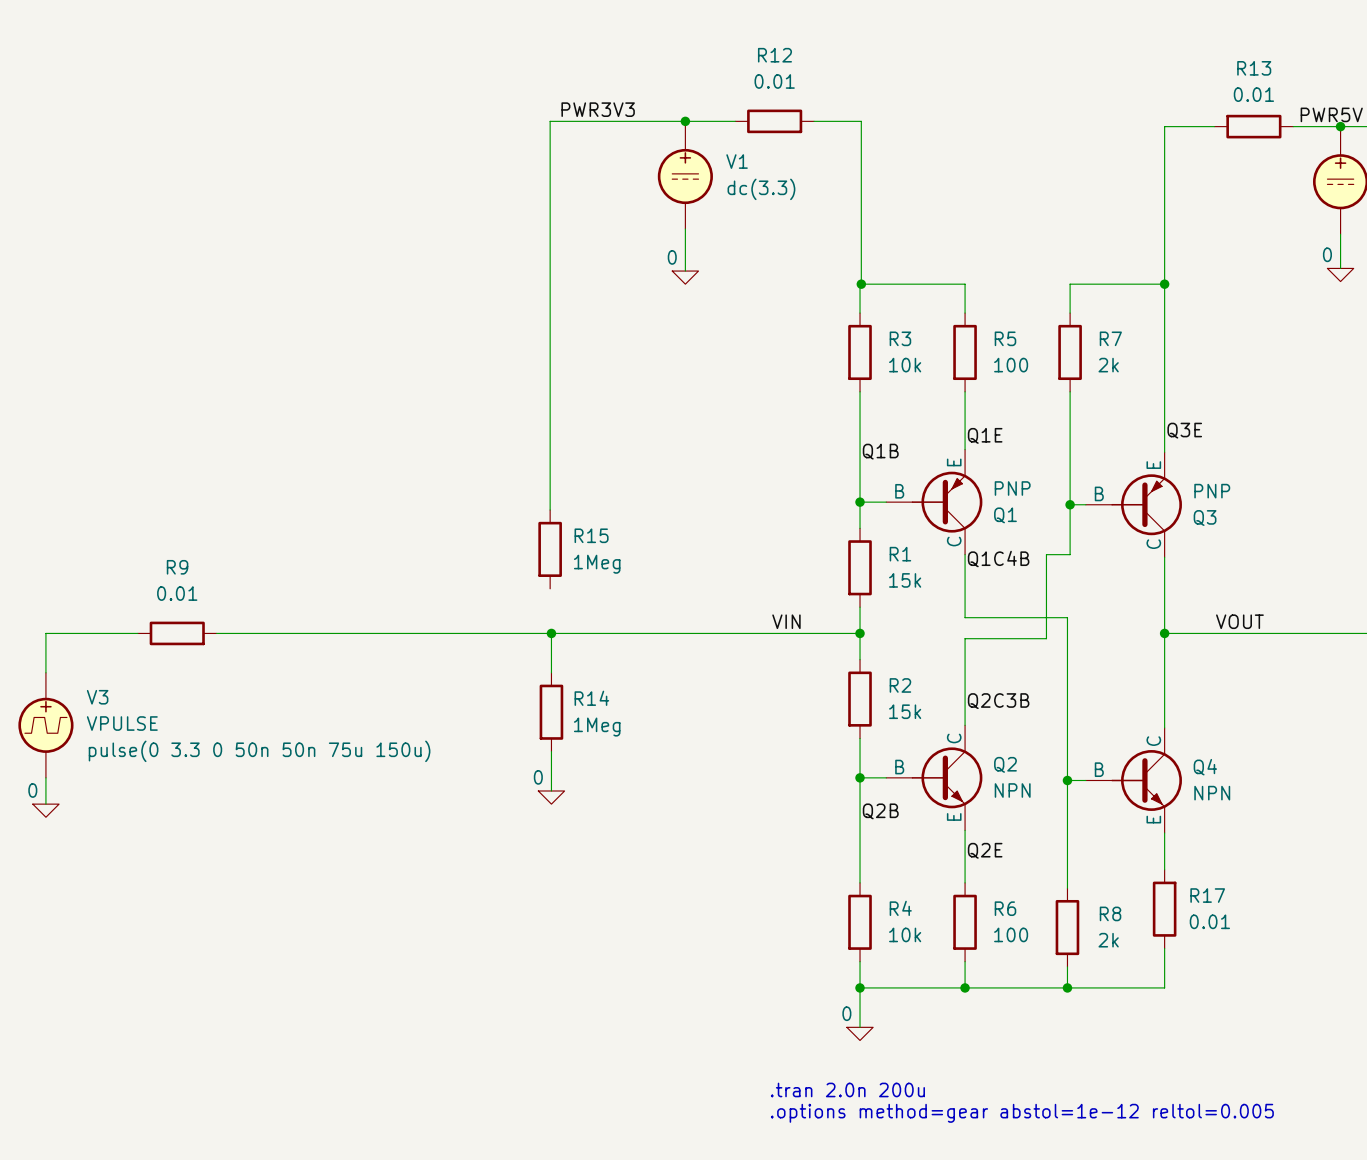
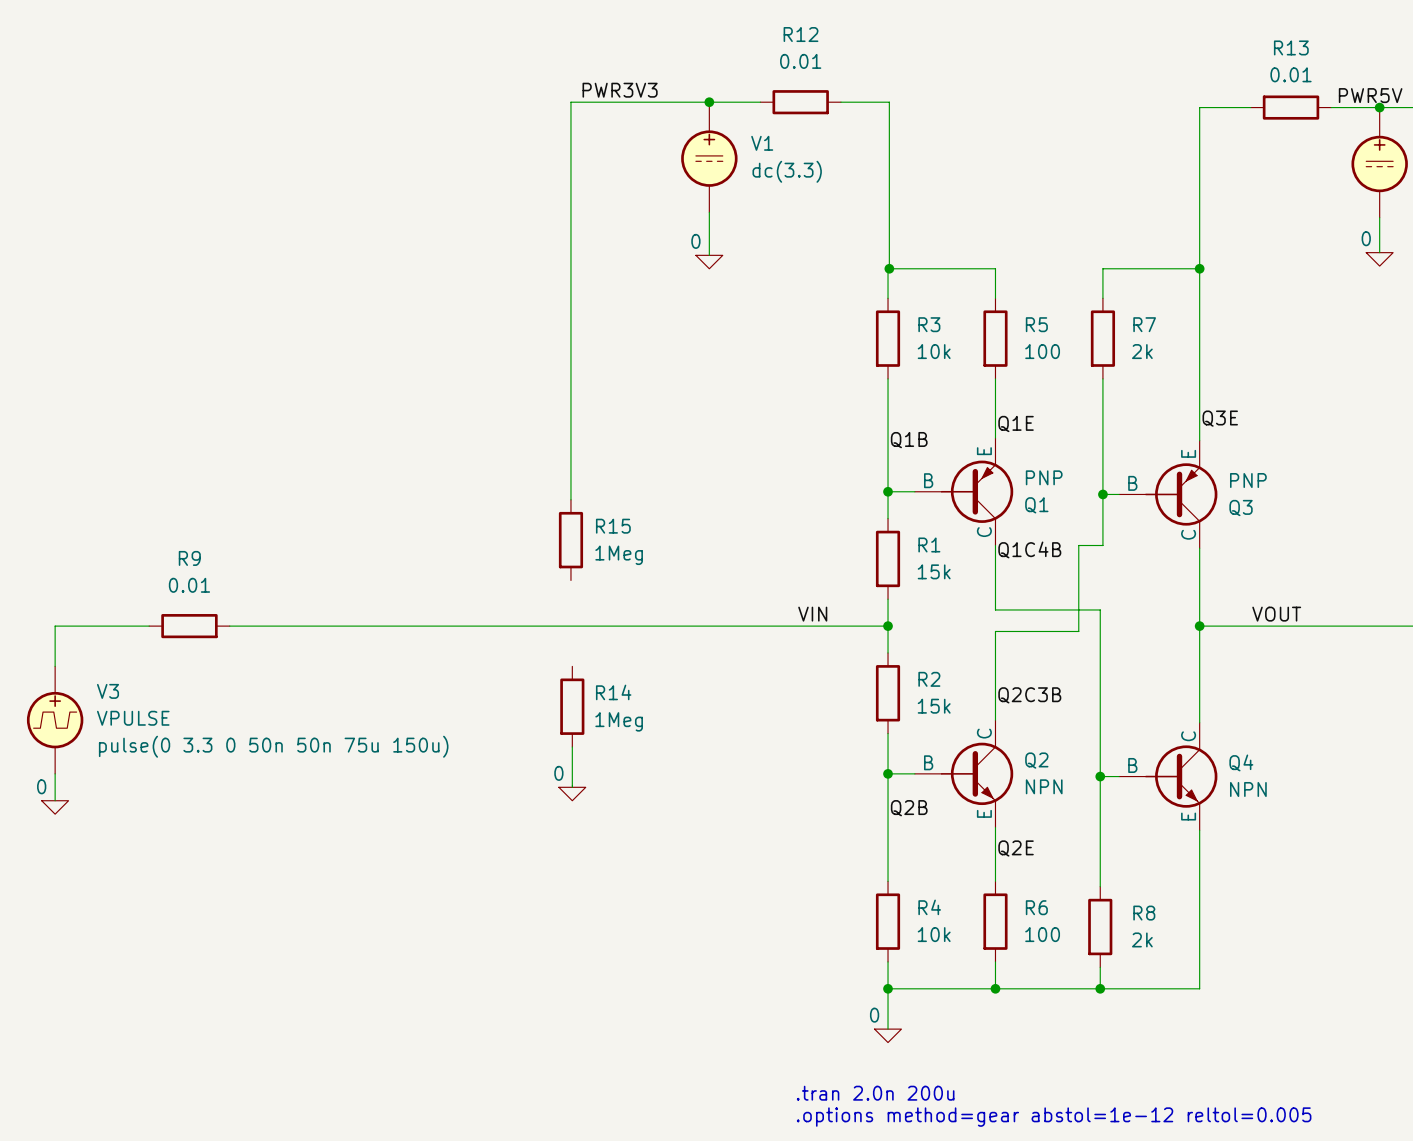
wire: (551, 633) (551, 672) -> none
junction: (551, 633) -> none
wire: none -> (1199, 867) (1199, 948)
R17: 0.01 (1164, 909) -> none

